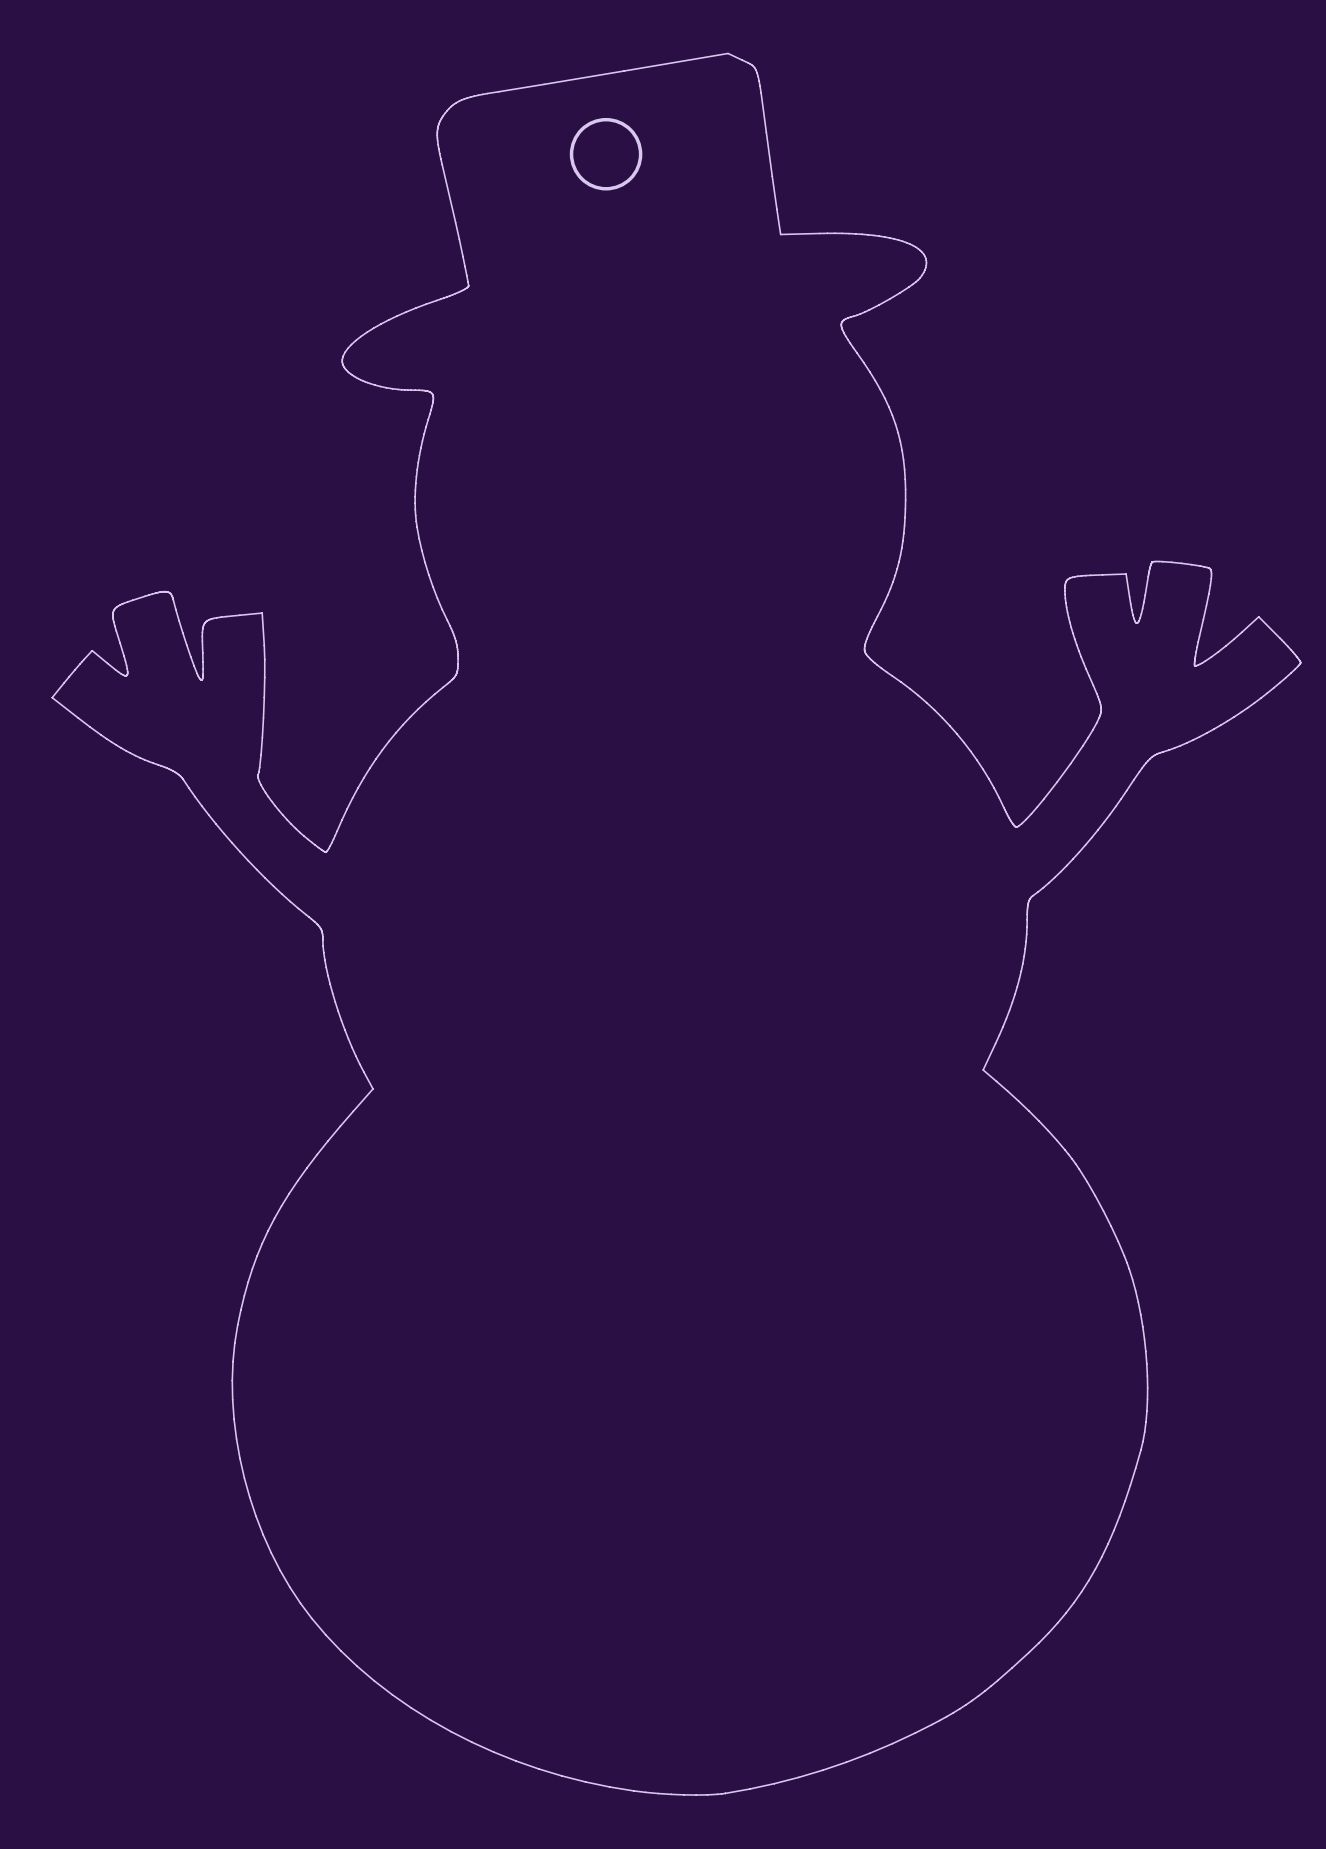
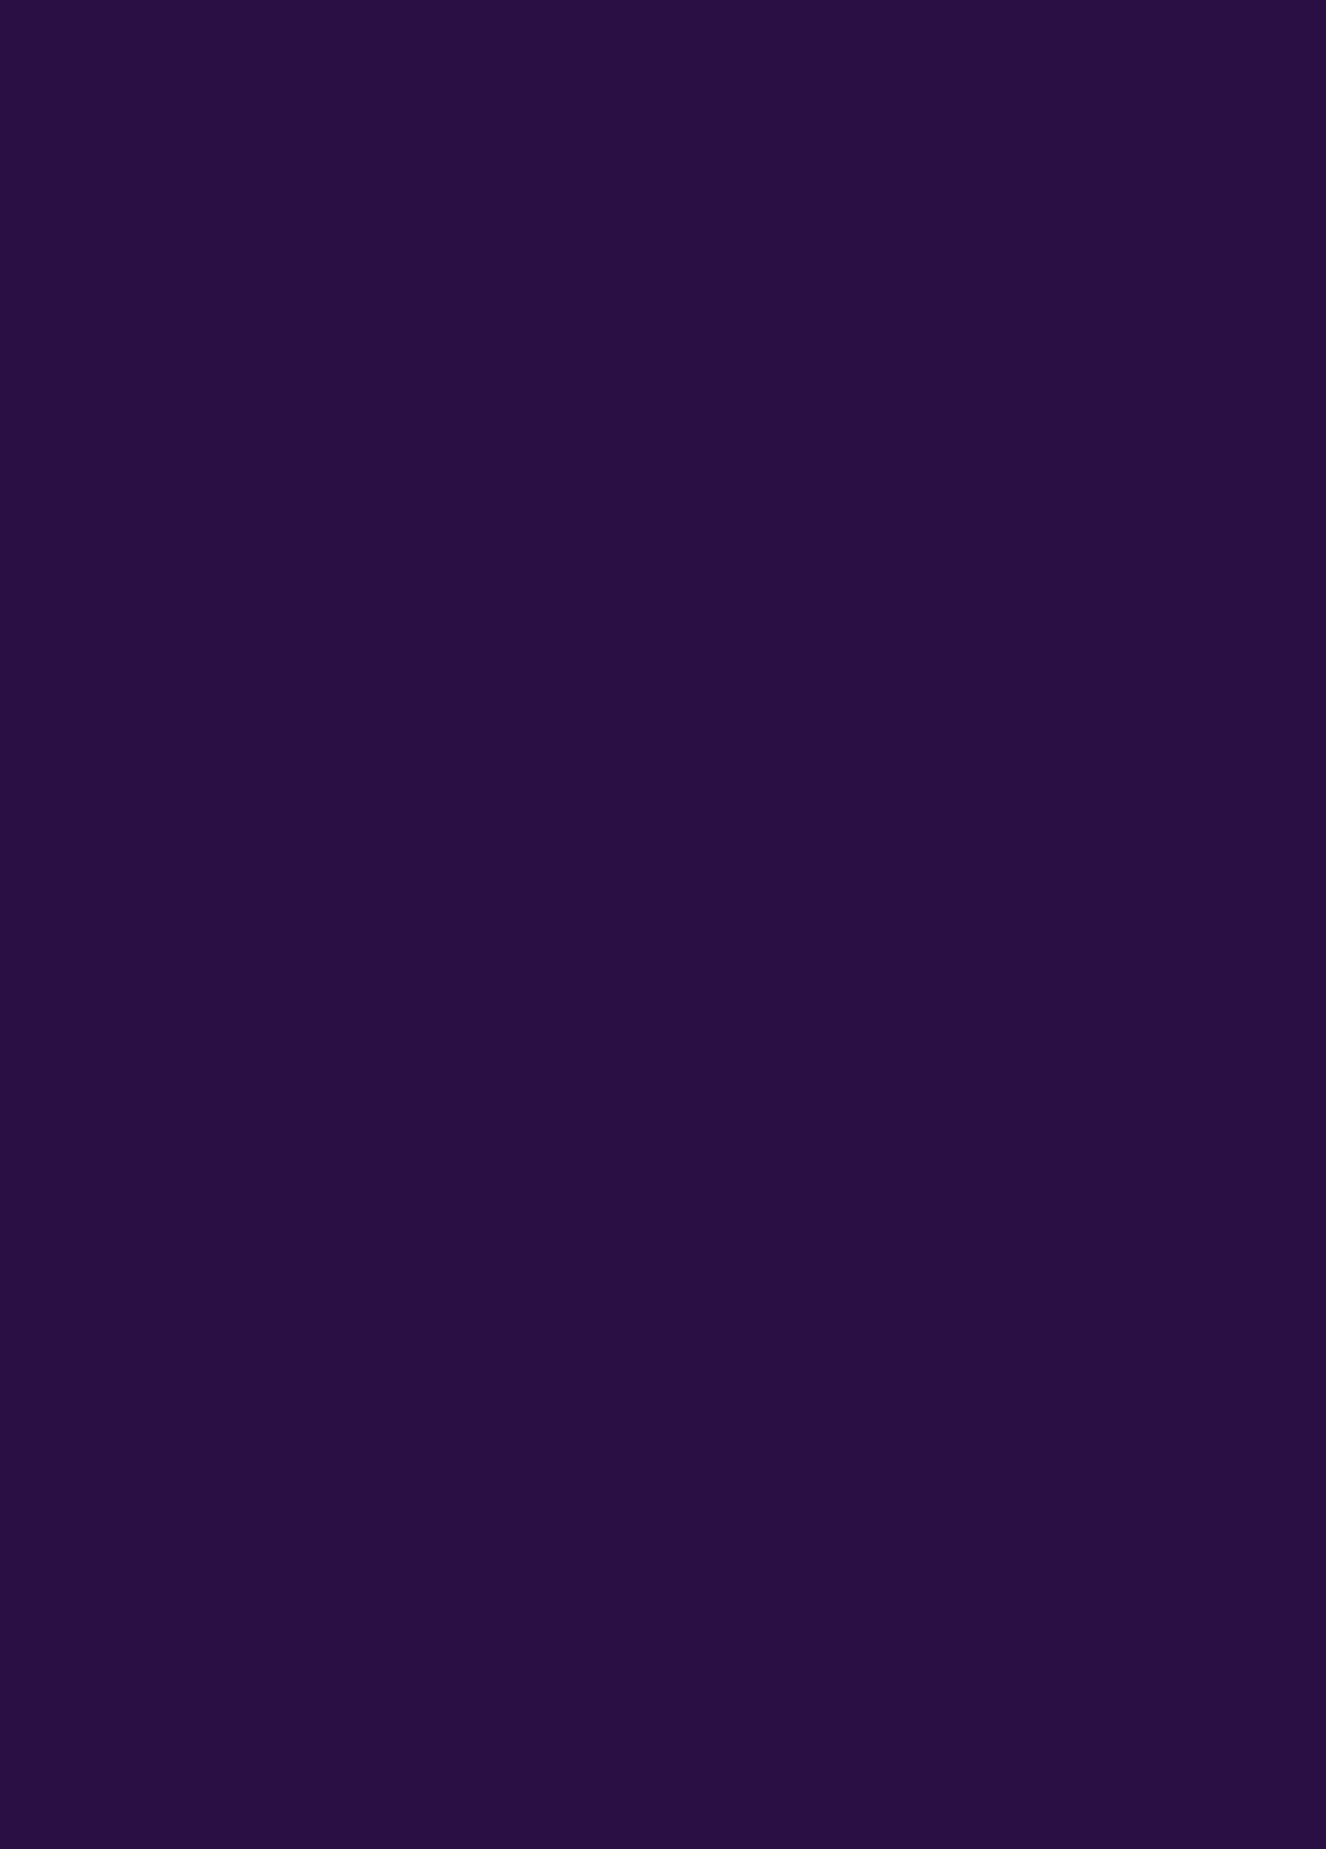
round board edge: [569, 117, 643, 191] -> none
board edge: (468, 285) (437, 138) (439, 121) (452, 105) (464, 99) (482, 94) (728, 53) (753, 66) (760, 86) (780, 234) (842, 233) (884, 237) (912, 245) (922, 252) (925, 258) (924, 270) (915, 282) (879, 304) (844, 319) (841, 323) (845, 335) (875, 380) (888, 406) (898, 432) (904, 469) (905, 517) (900, 555) (892, 582) (868, 634) (864, 650) (874, 663) (926, 702) (957, 734) (983, 769) (1015, 826) -> none
board edge: (468, 286) (380, 324) (355, 340) (342, 357) (342, 363) (346, 370) (364, 381) (392, 388) (426, 391) (432, 394) (432, 402) (417, 469) (415, 515) (419, 538) (428, 574) (455, 640) (458, 664) (453, 678) (410, 716) (375, 759) (352, 798) (326, 852) -> none
board edge: (1152, 561) (1181, 563) (1210, 569) (1210, 585) (1194, 665) -> none
board edge: (1151, 562) (1141, 613) (1136, 623) (1132, 614) (1126, 574) (1077, 576) (1070, 578) (1066, 581) (1065, 598) (1069, 622) (1078, 650) (1099, 699) (1100, 712) (1088, 737) (1057, 782) (1031, 813) (1016, 827) -> none
board edge: (1300, 662) (1258, 616) (1218, 651) (1195, 665) -> none
board edge: (1300, 662) (1273, 687) (1234, 716) (1193, 739) (1151, 757) (1085, 845) (1054, 877) (1030, 897) (1027, 907) (1024, 956) (1017, 986) (1003, 1026) (983, 1070) (1039, 1121) (1079, 1169) (1118, 1241) (1129, 1268) (1138, 1302) (1144, 1339) (1147, 1376) (1144, 1432) (1125, 1501) (1108, 1544) (1095, 1569) (1073, 1602) (1039, 1642) (984, 1691) (946, 1716) (892, 1743) (822, 1770) (750, 1788) (721, 1793) (696, 1795) (633, 1790) (561, 1775) (493, 1752) (430, 1720) (374, 1680) (325, 1635) (289, 1587) (263, 1534) (244, 1478) (234, 1419) (233, 1361) (237, 1324) (244, 1295) (262, 1243) (289, 1193) (328, 1140) (373, 1088) (352, 1047) (338, 1011) (328, 975) (322, 933) (319, 926) (273, 886) (239, 851) (208, 814) (179, 775) (116, 745) (52, 697) (92, 650) (118, 672) (126, 675) (126, 665) (113, 619) (113, 611) (123, 603) (161, 591) (168, 592) (172, 595) (190, 656) (201, 680) -> none
board edge: (202, 679) (202, 632) (205, 622) (216, 617) (262, 613) (264, 697) (258, 778) (268, 796) (287, 819) (304, 836) (325, 852) -> none

